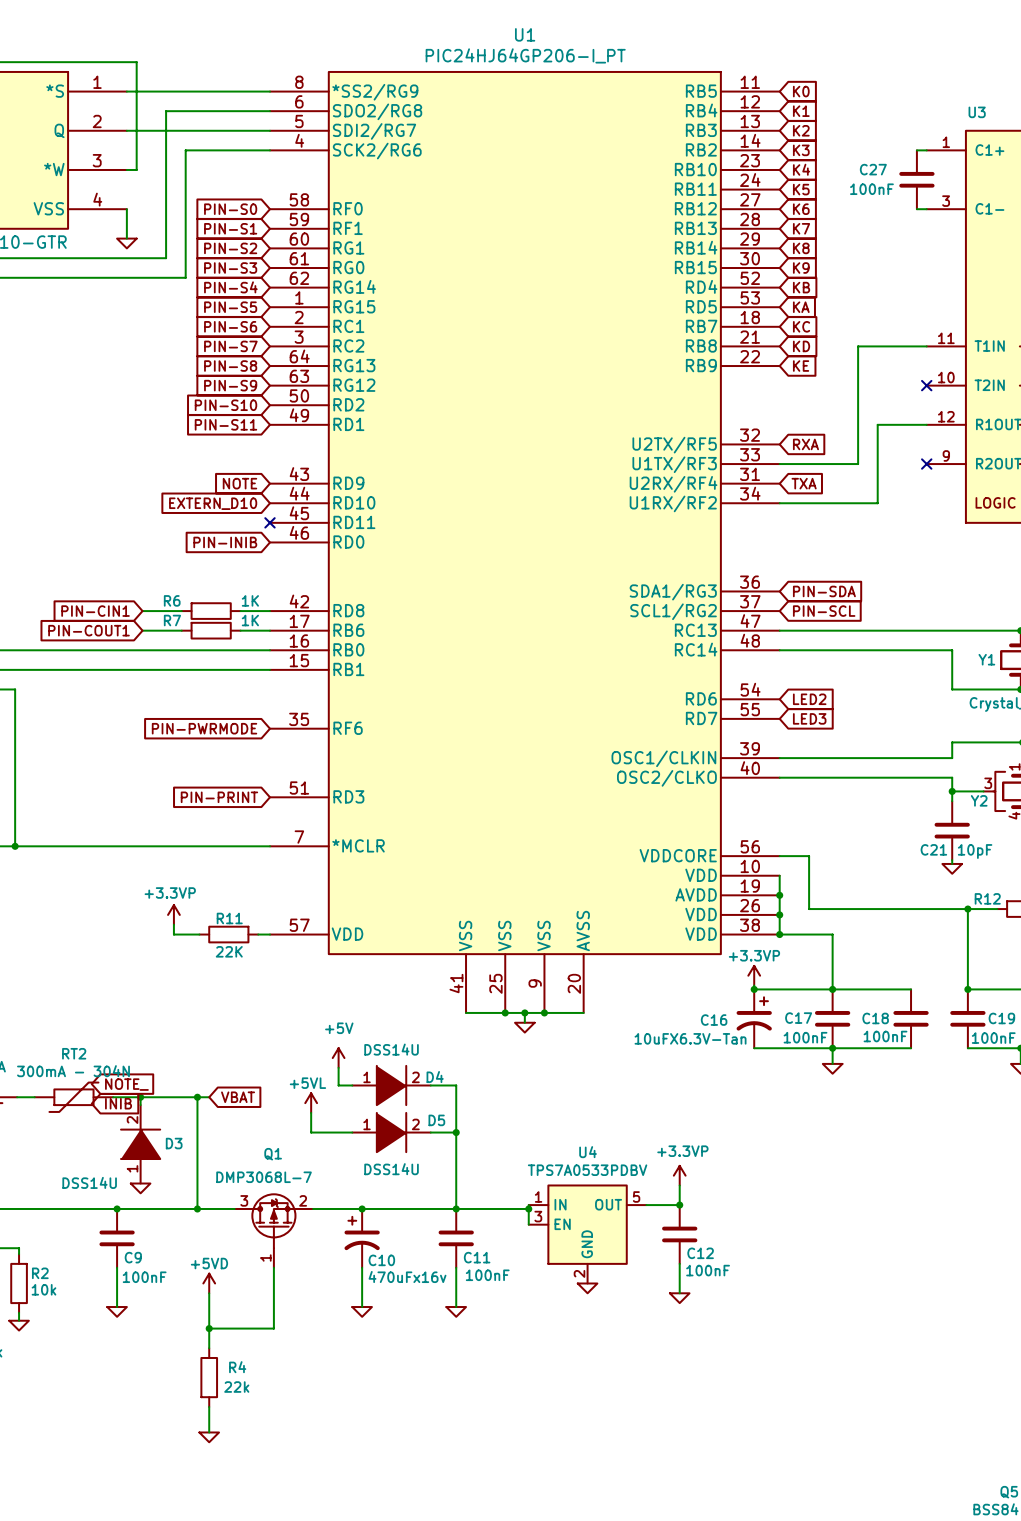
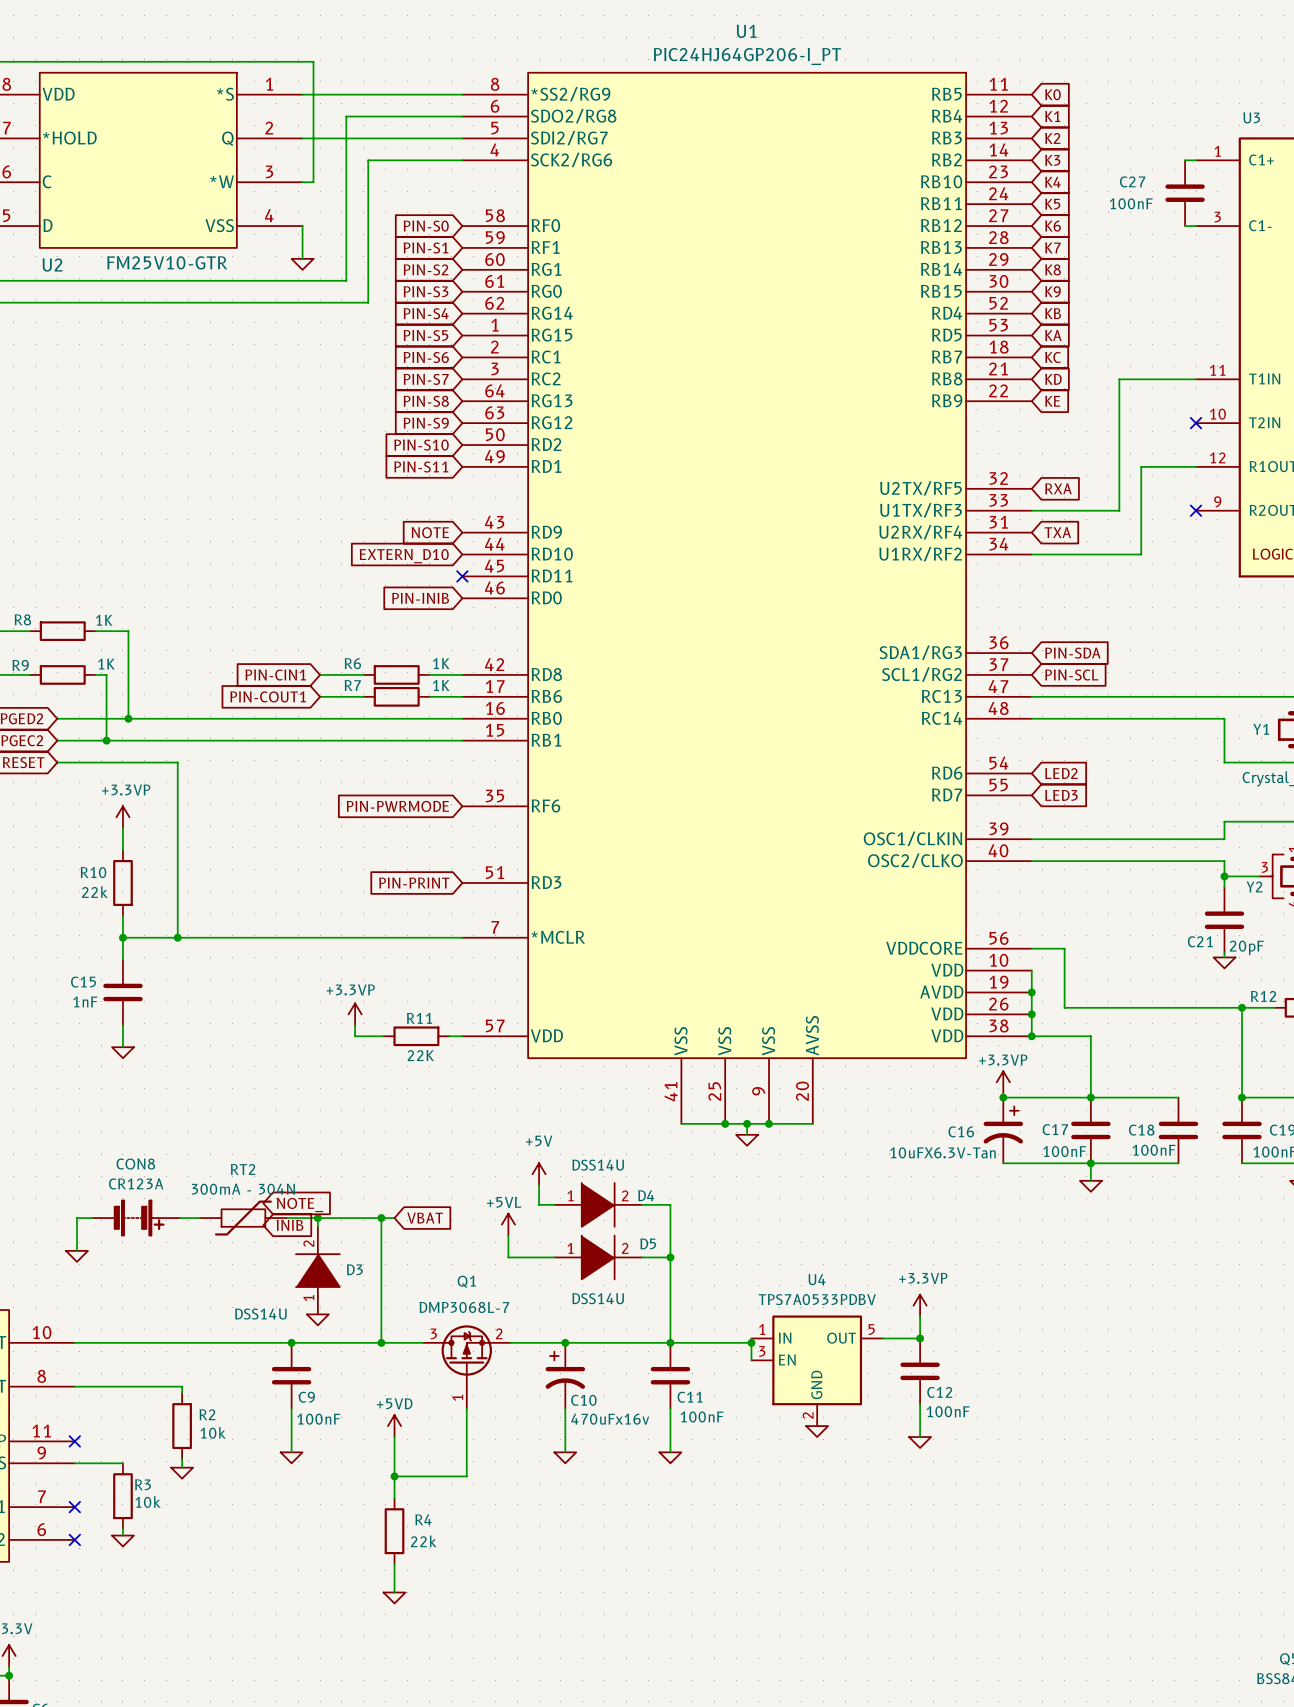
C21 value: 10pF (975, 851) -> 20pF (1246, 947)

